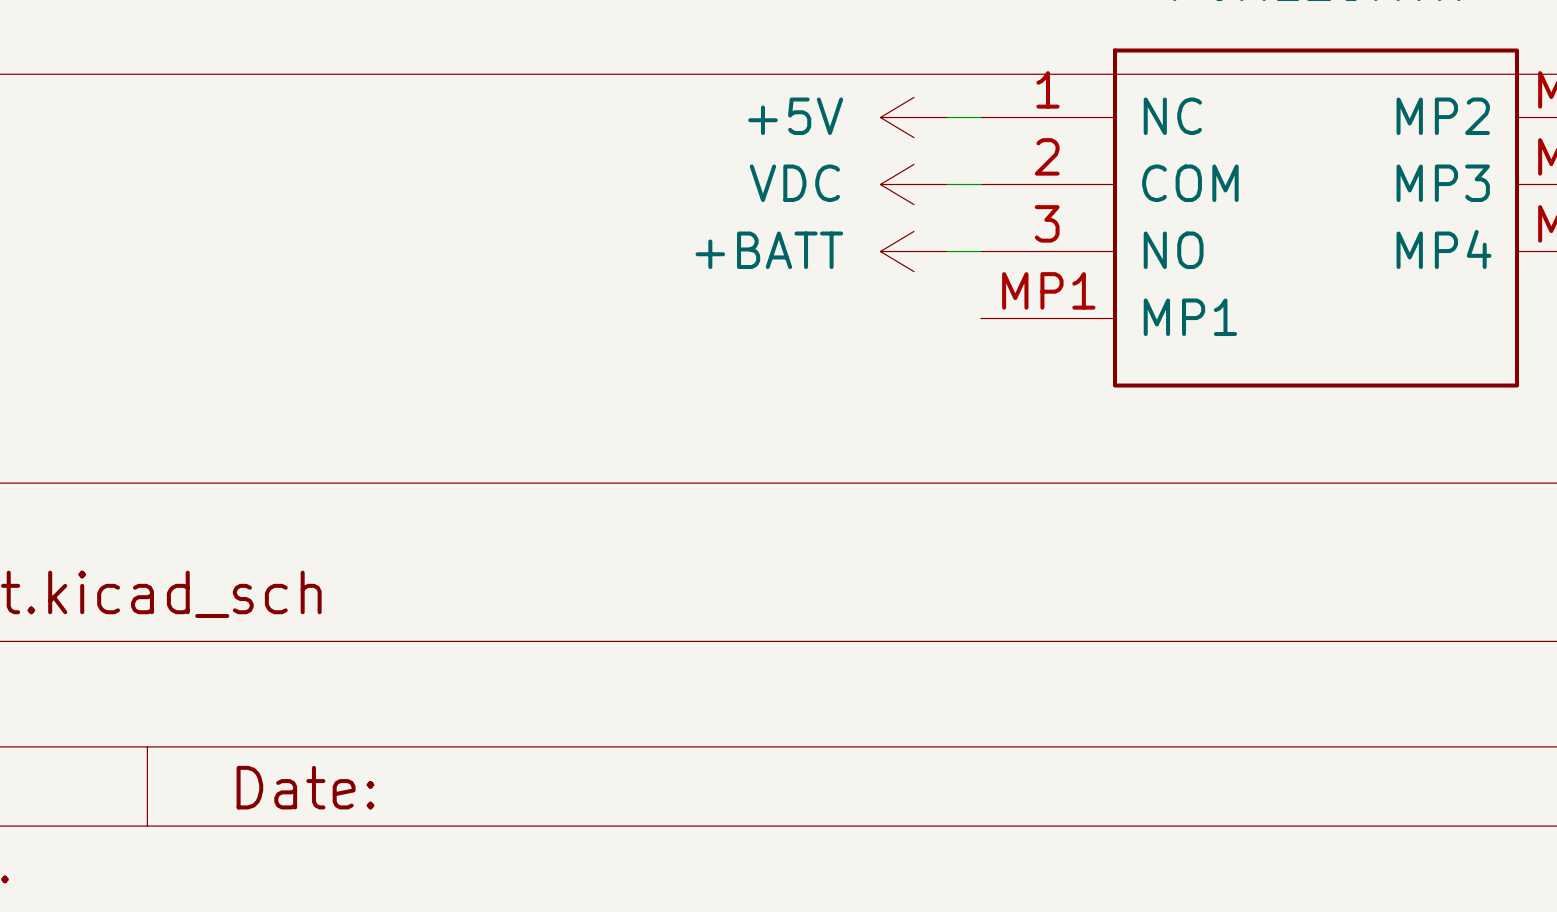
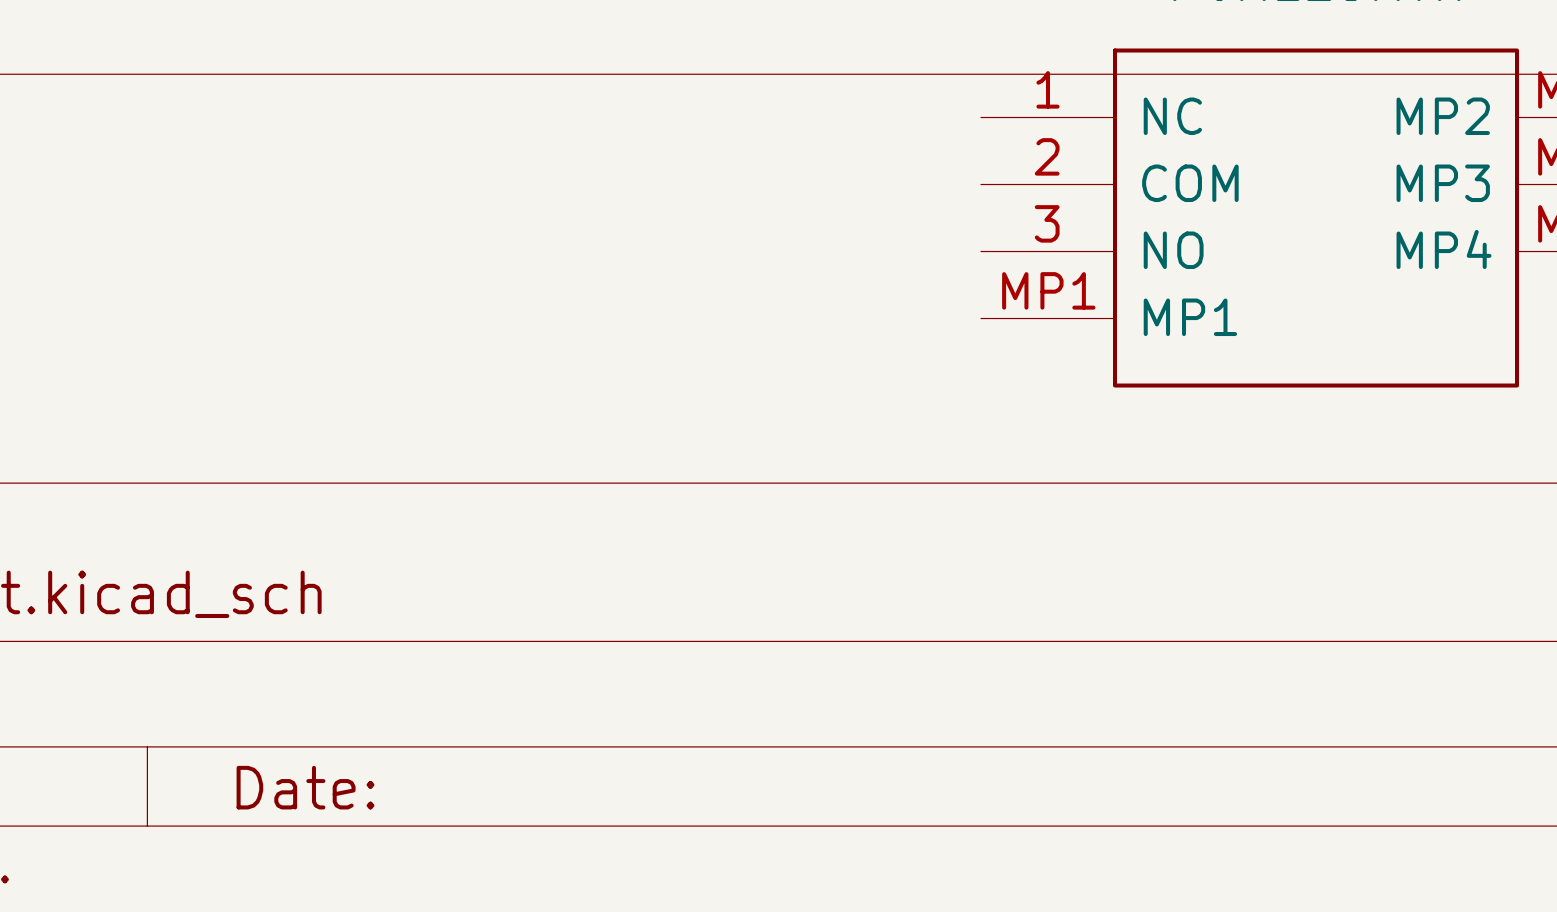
power symbol: +5V (913, 117) -> none
wire: (947, 117) (980, 117) -> none
power symbol: VDC (913, 184) -> none
wire: (947, 184) (980, 184) -> none
power symbol: +BATT (913, 251) -> none
wire: (947, 251) (980, 251) -> none

